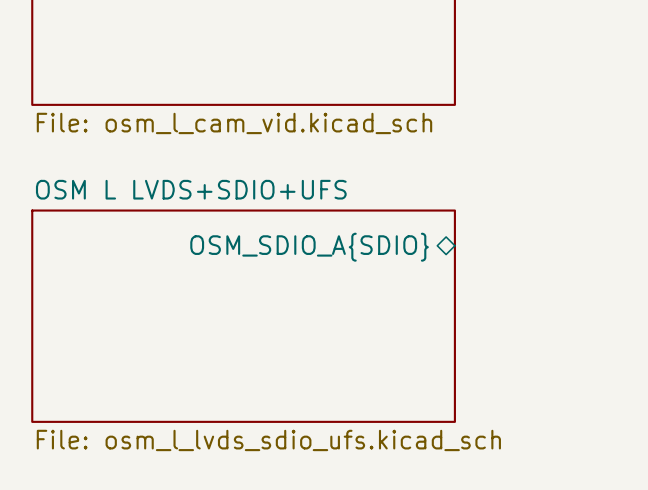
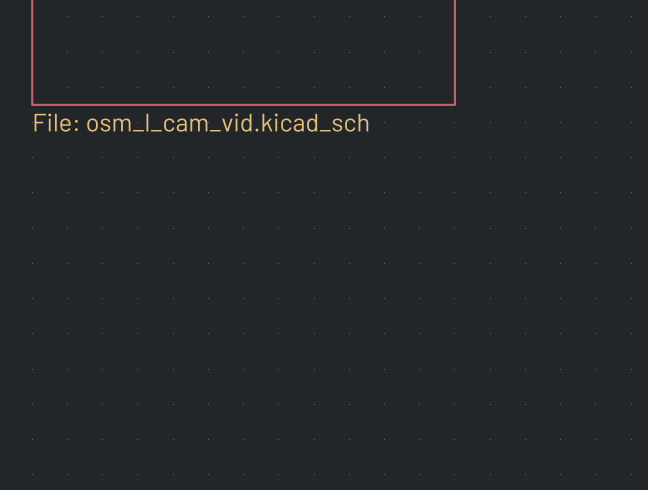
sheet pin: OSM_SDIO_A{SDIO} (309, 247) -> none
sheet OSM L LVDS+SDIO+UFS: File: osm_l_lvds_sdio_ufs.kicad_sch (243, 316) -> none

